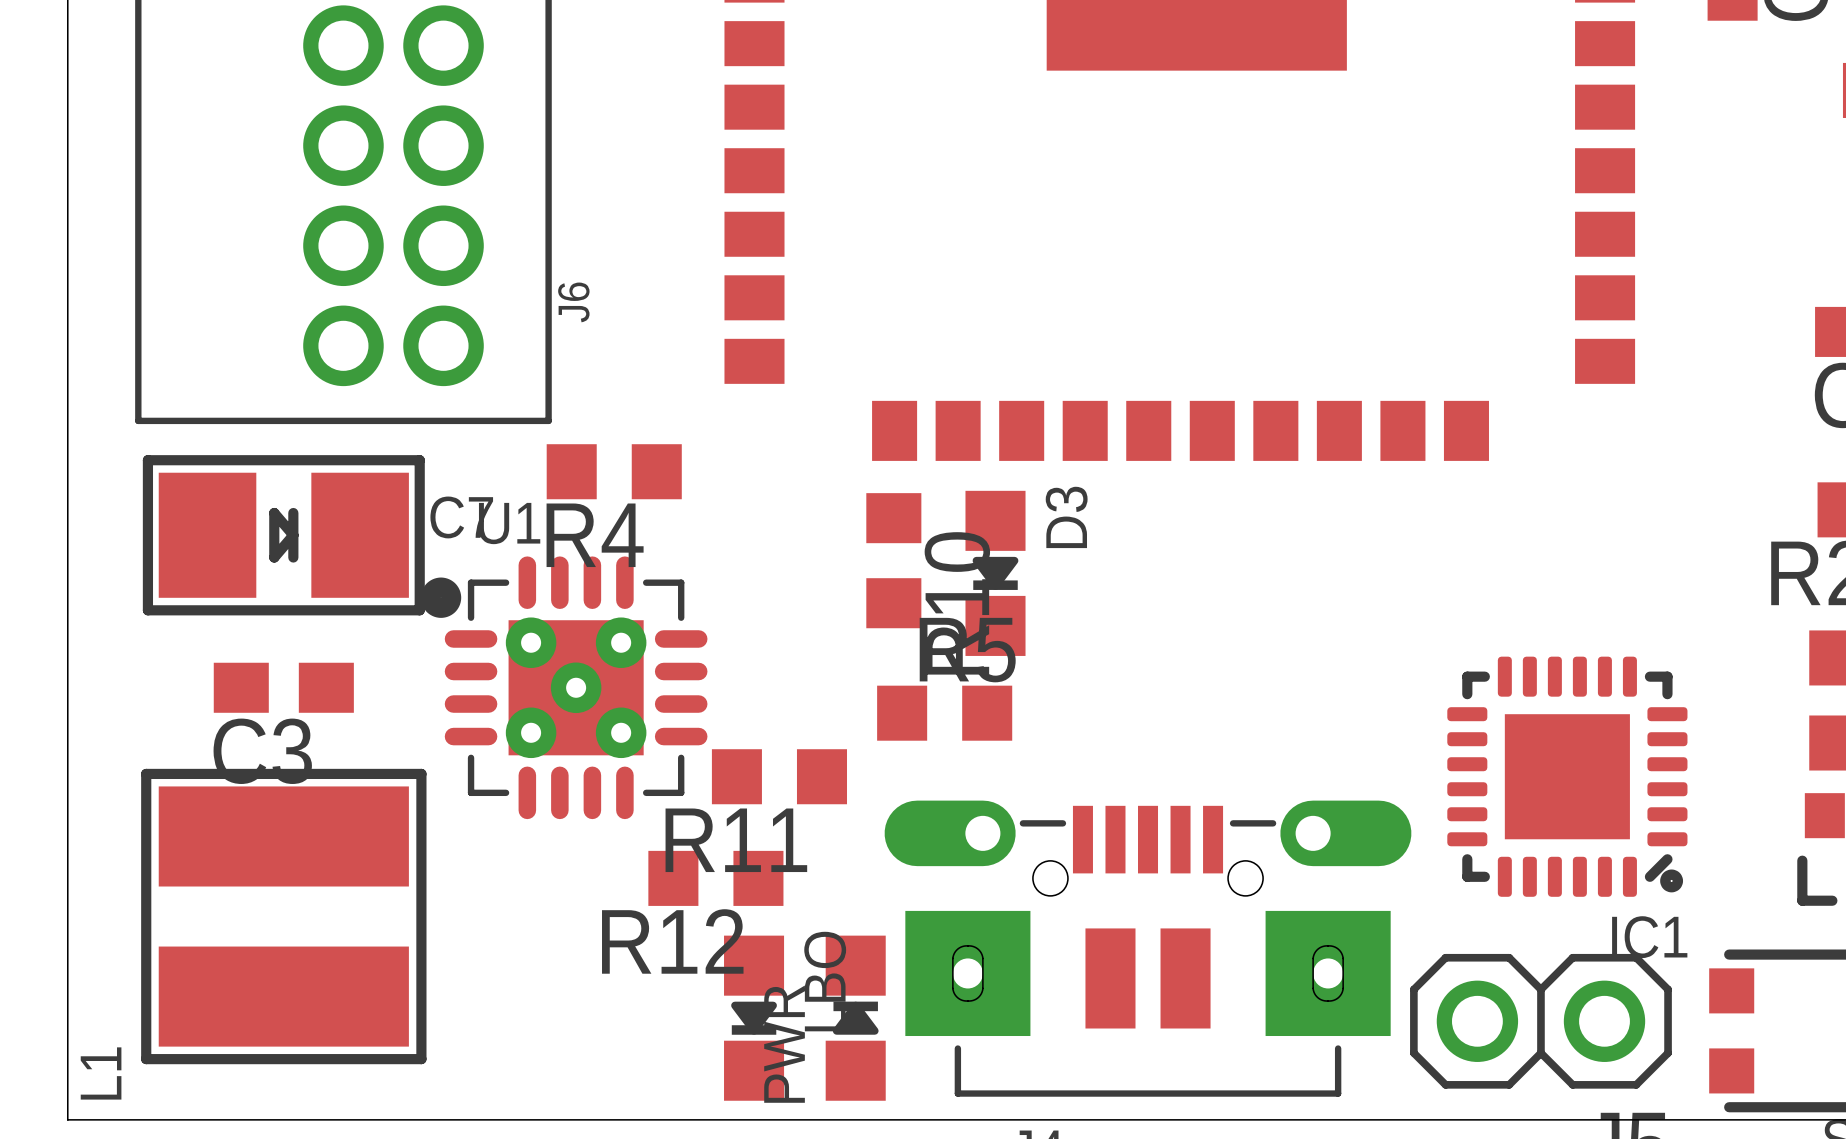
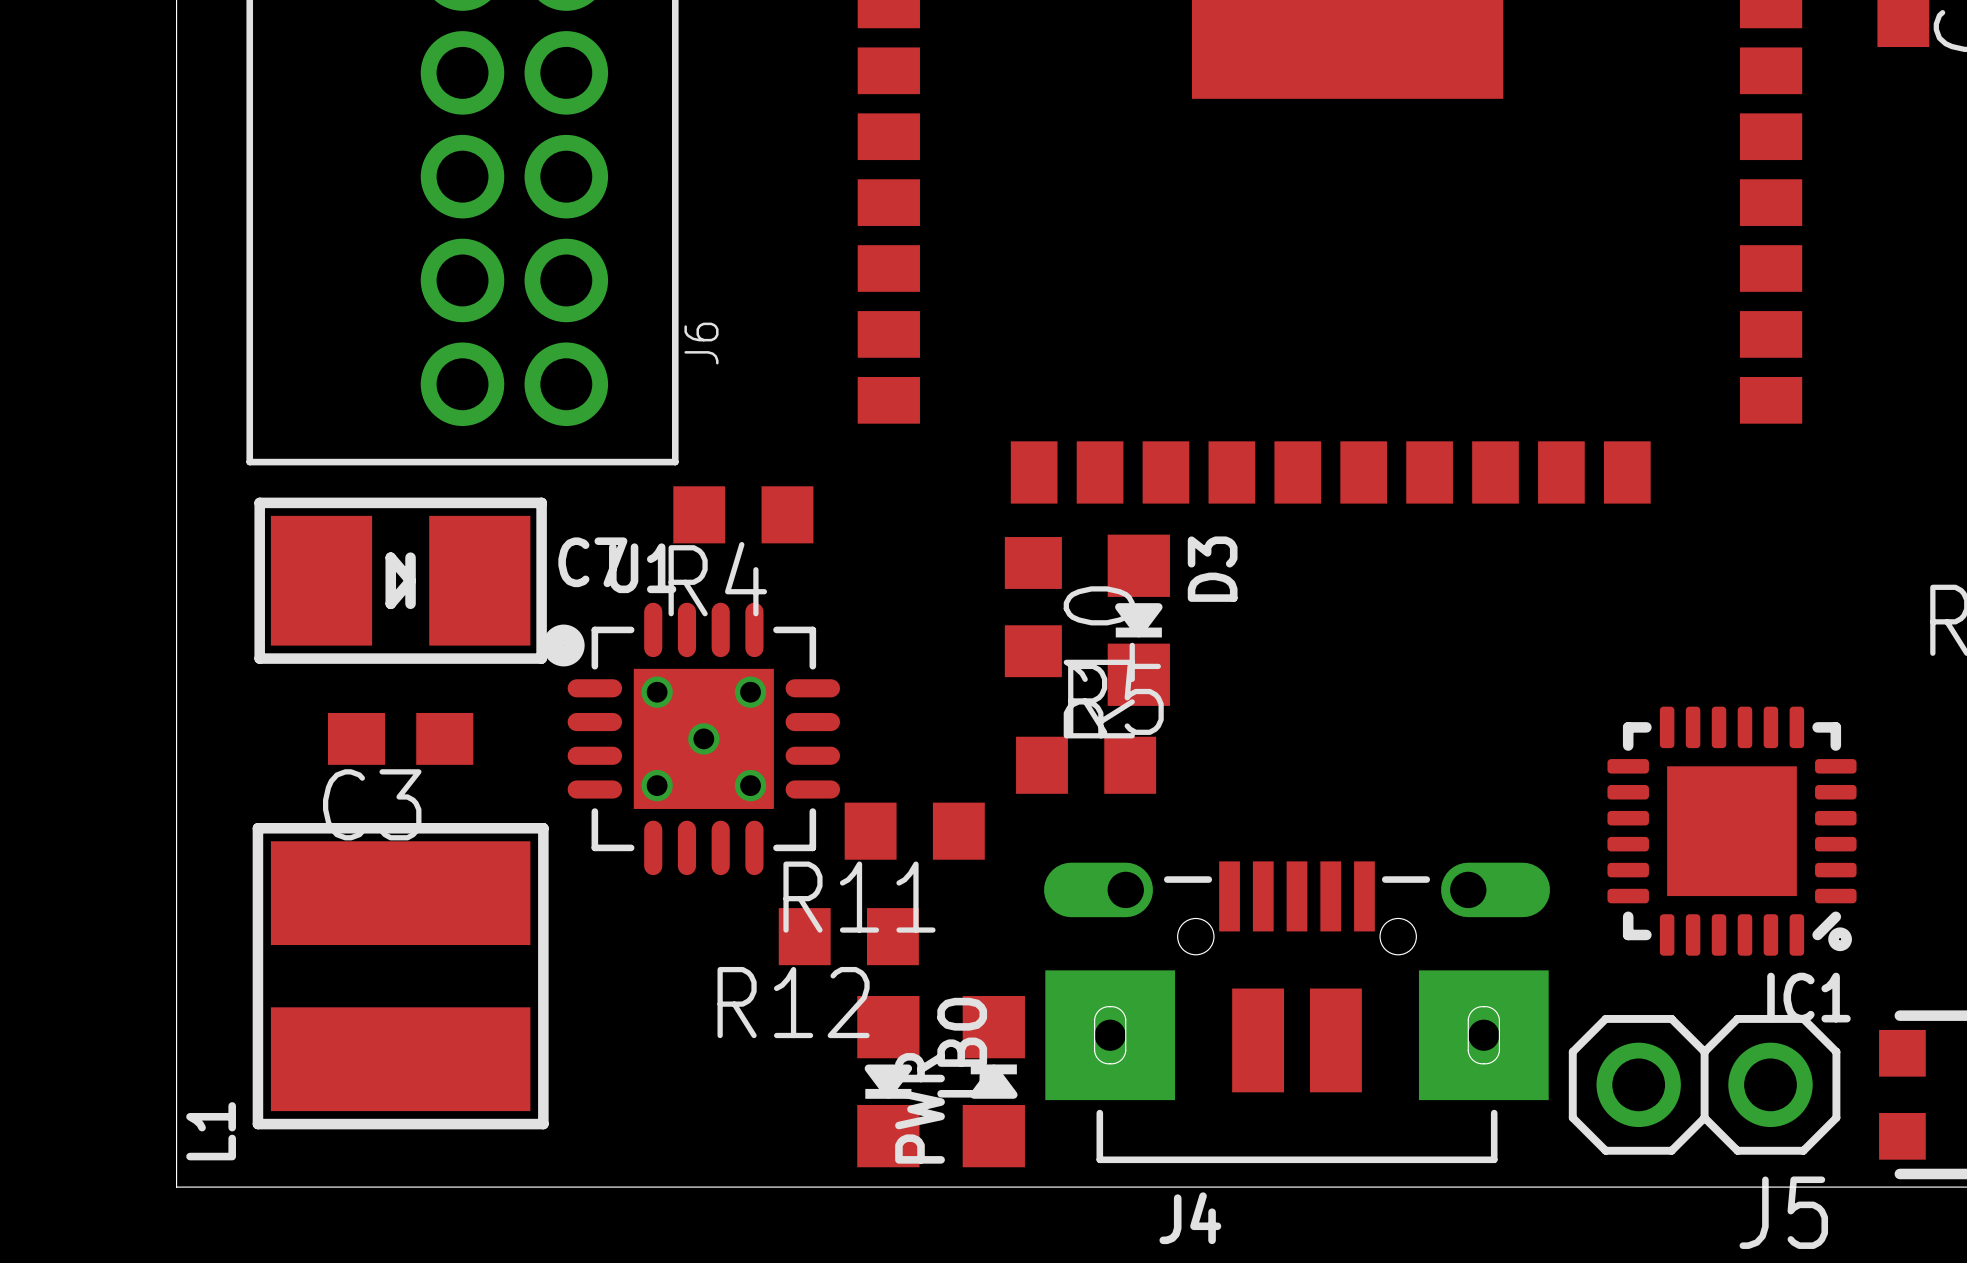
U1 footprint: [420, 556, 708, 820] -> [542, 602, 841, 876]
J4 footprint: [884, 800, 1412, 1097] -> [1044, 861, 1551, 1164]

